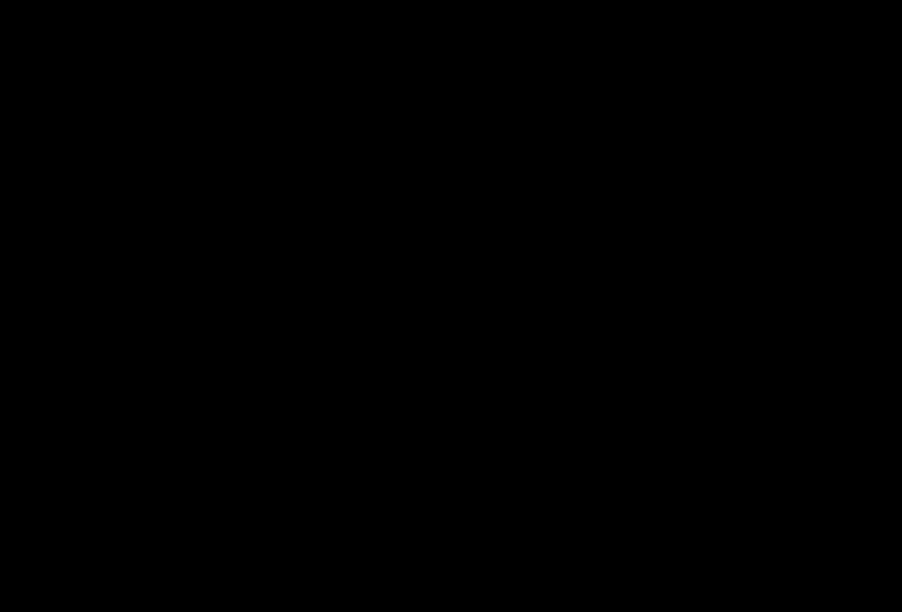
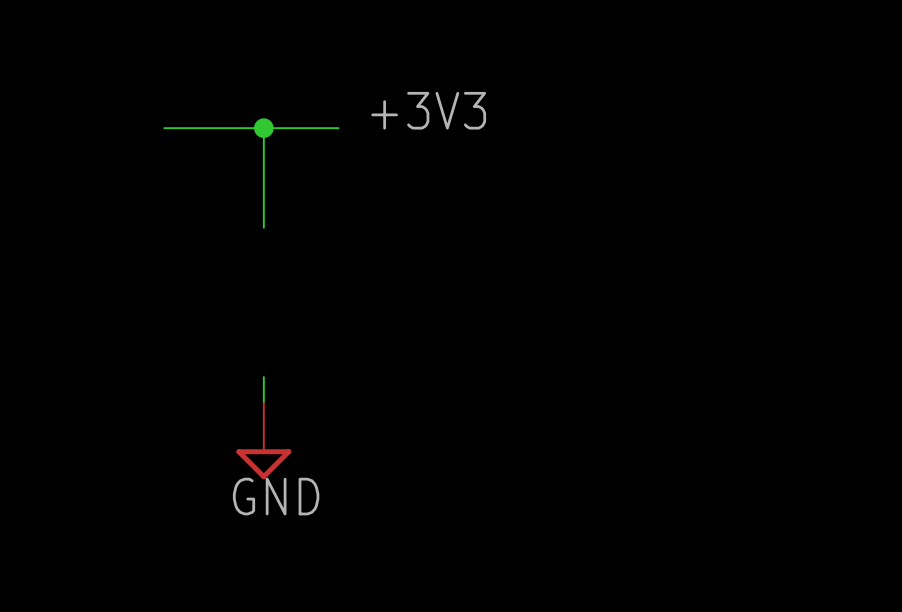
label: none -> +3V3 (428, 110)
wire: none -> (164, 128) (338, 128)
wire: none -> (263, 128) (263, 227)
junction: none -> (263, 128)
wire: none -> (263, 377) (263, 401)
power symbol: none -> GND (263, 440)

